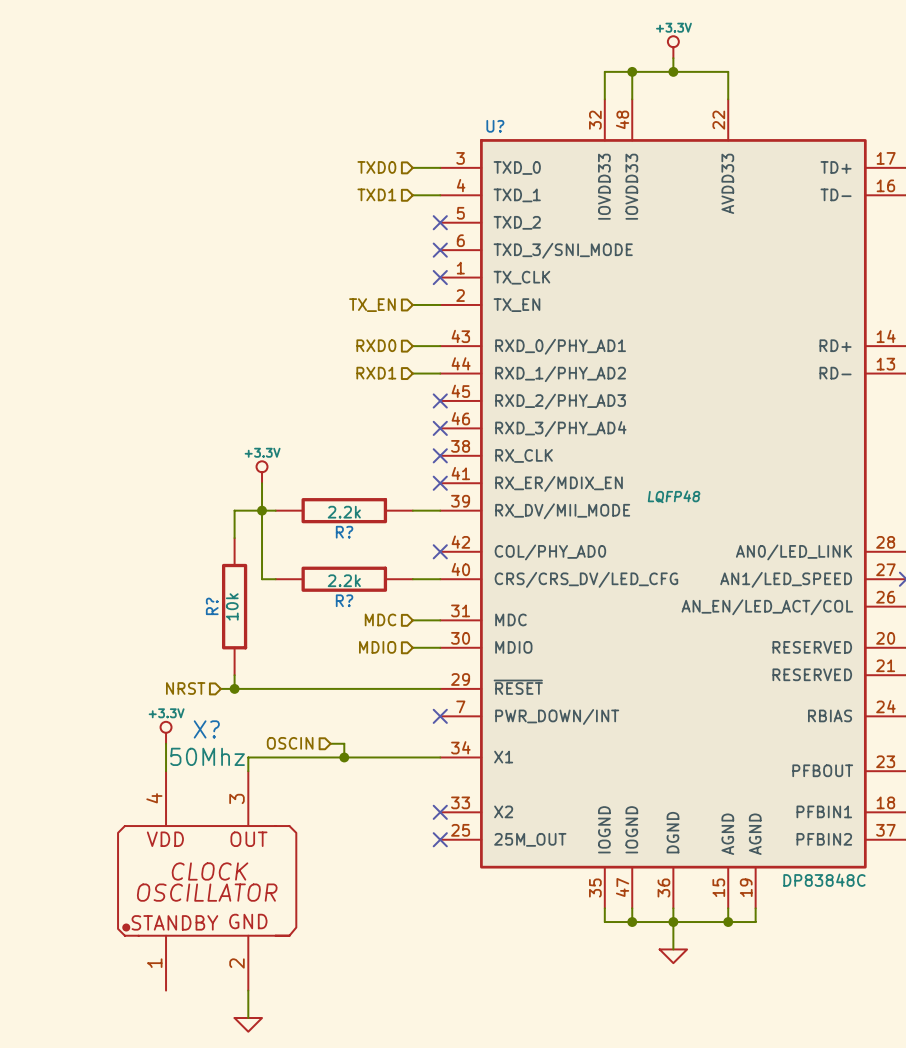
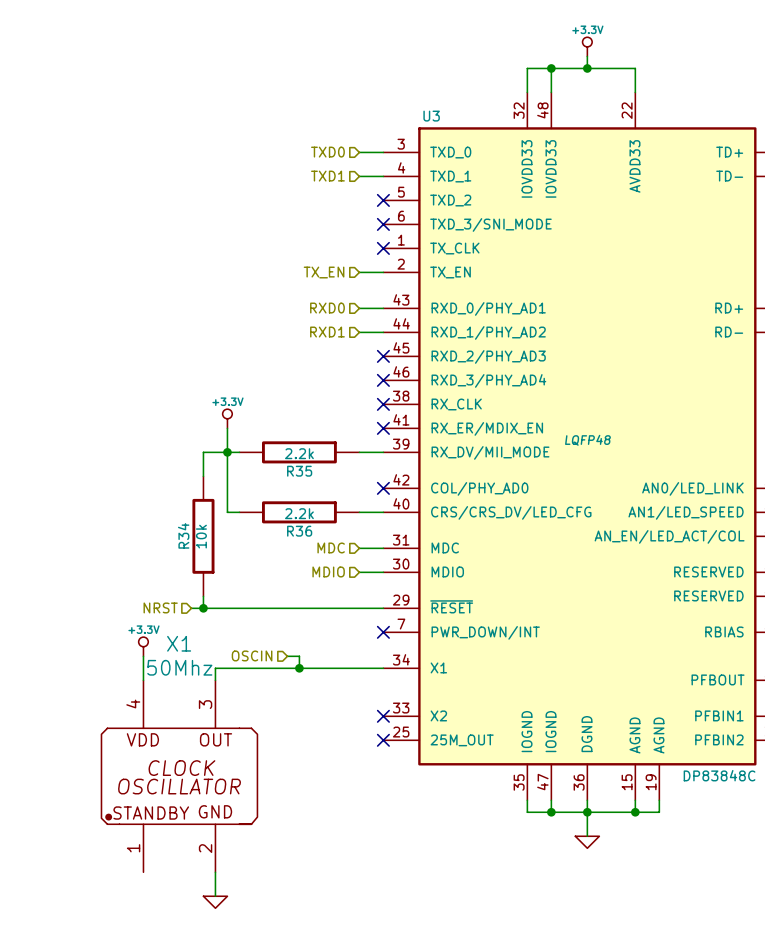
U? name: U? (495, 126) -> U3 (431, 116)
R? name: R? (344, 532) -> R35 (299, 471)
R? name: R? (344, 600) -> R36 (299, 531)
R? name: R? (212, 606) -> R34 (183, 535)
X? name: X? (206, 729) -> X1 (179, 643)

